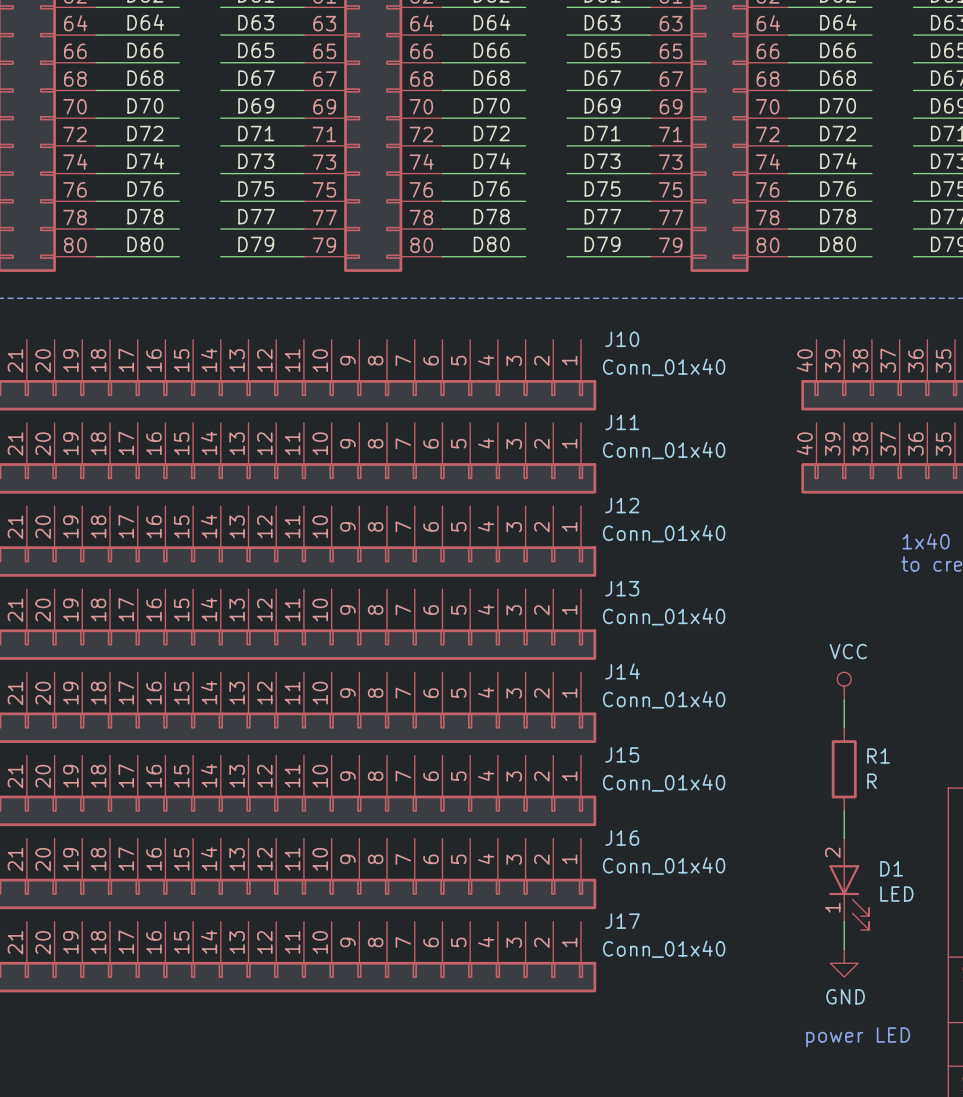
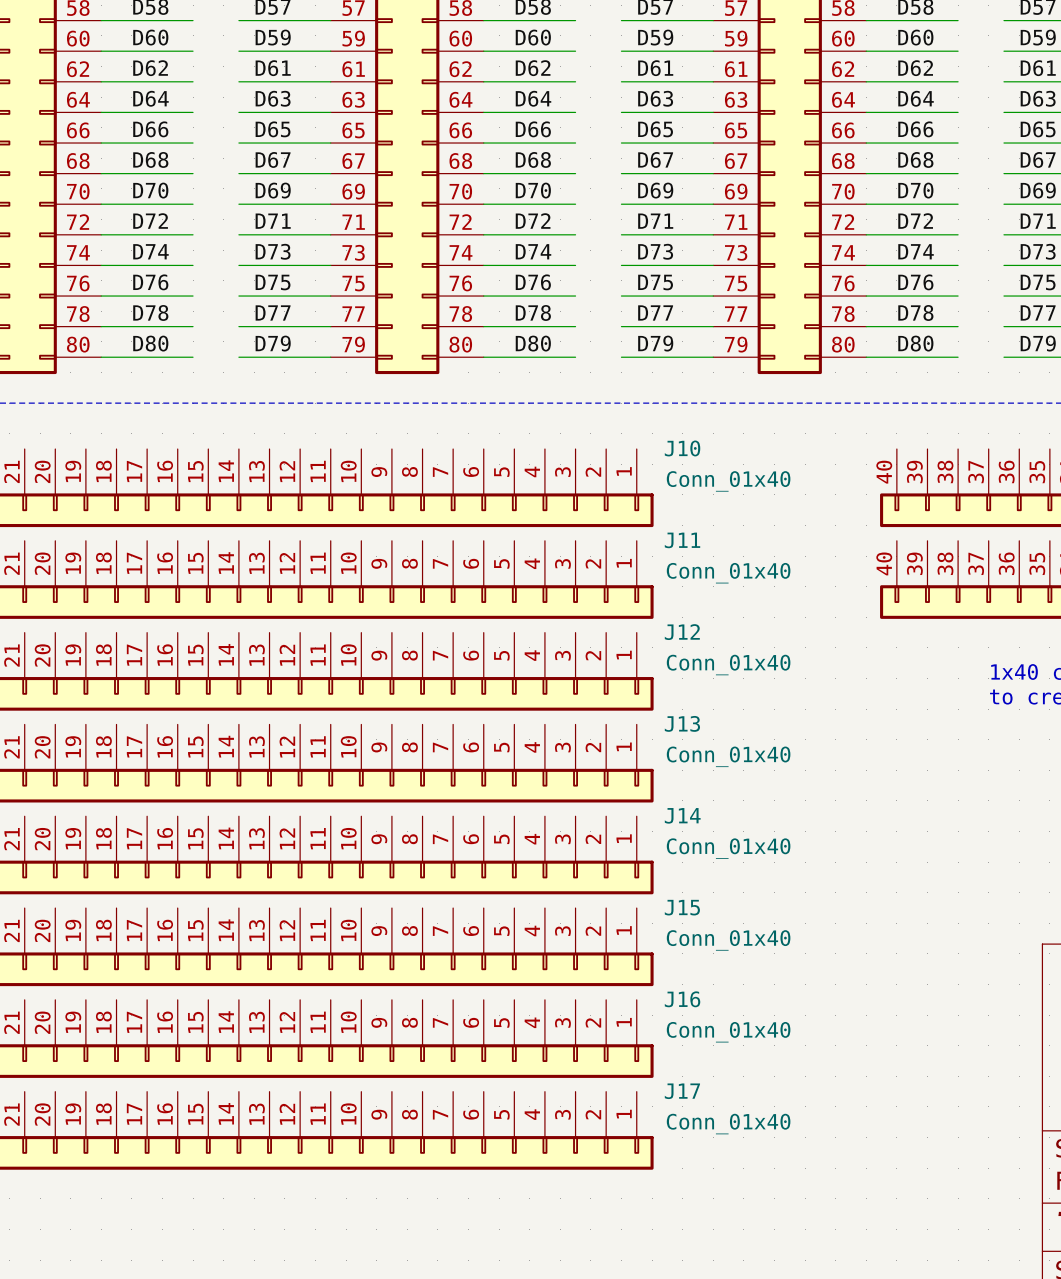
power symbol: VCC (844, 686) -> none
wire: (844, 700) (844, 727) -> none
R1: R (844, 769) -> none
wire: (844, 810) (844, 838) -> none
D1: LED (849, 884) -> none
wire: (844, 921) (844, 949) -> none
power symbol: GND (844, 963) -> none
text: power LED (858, 1037) -> none

